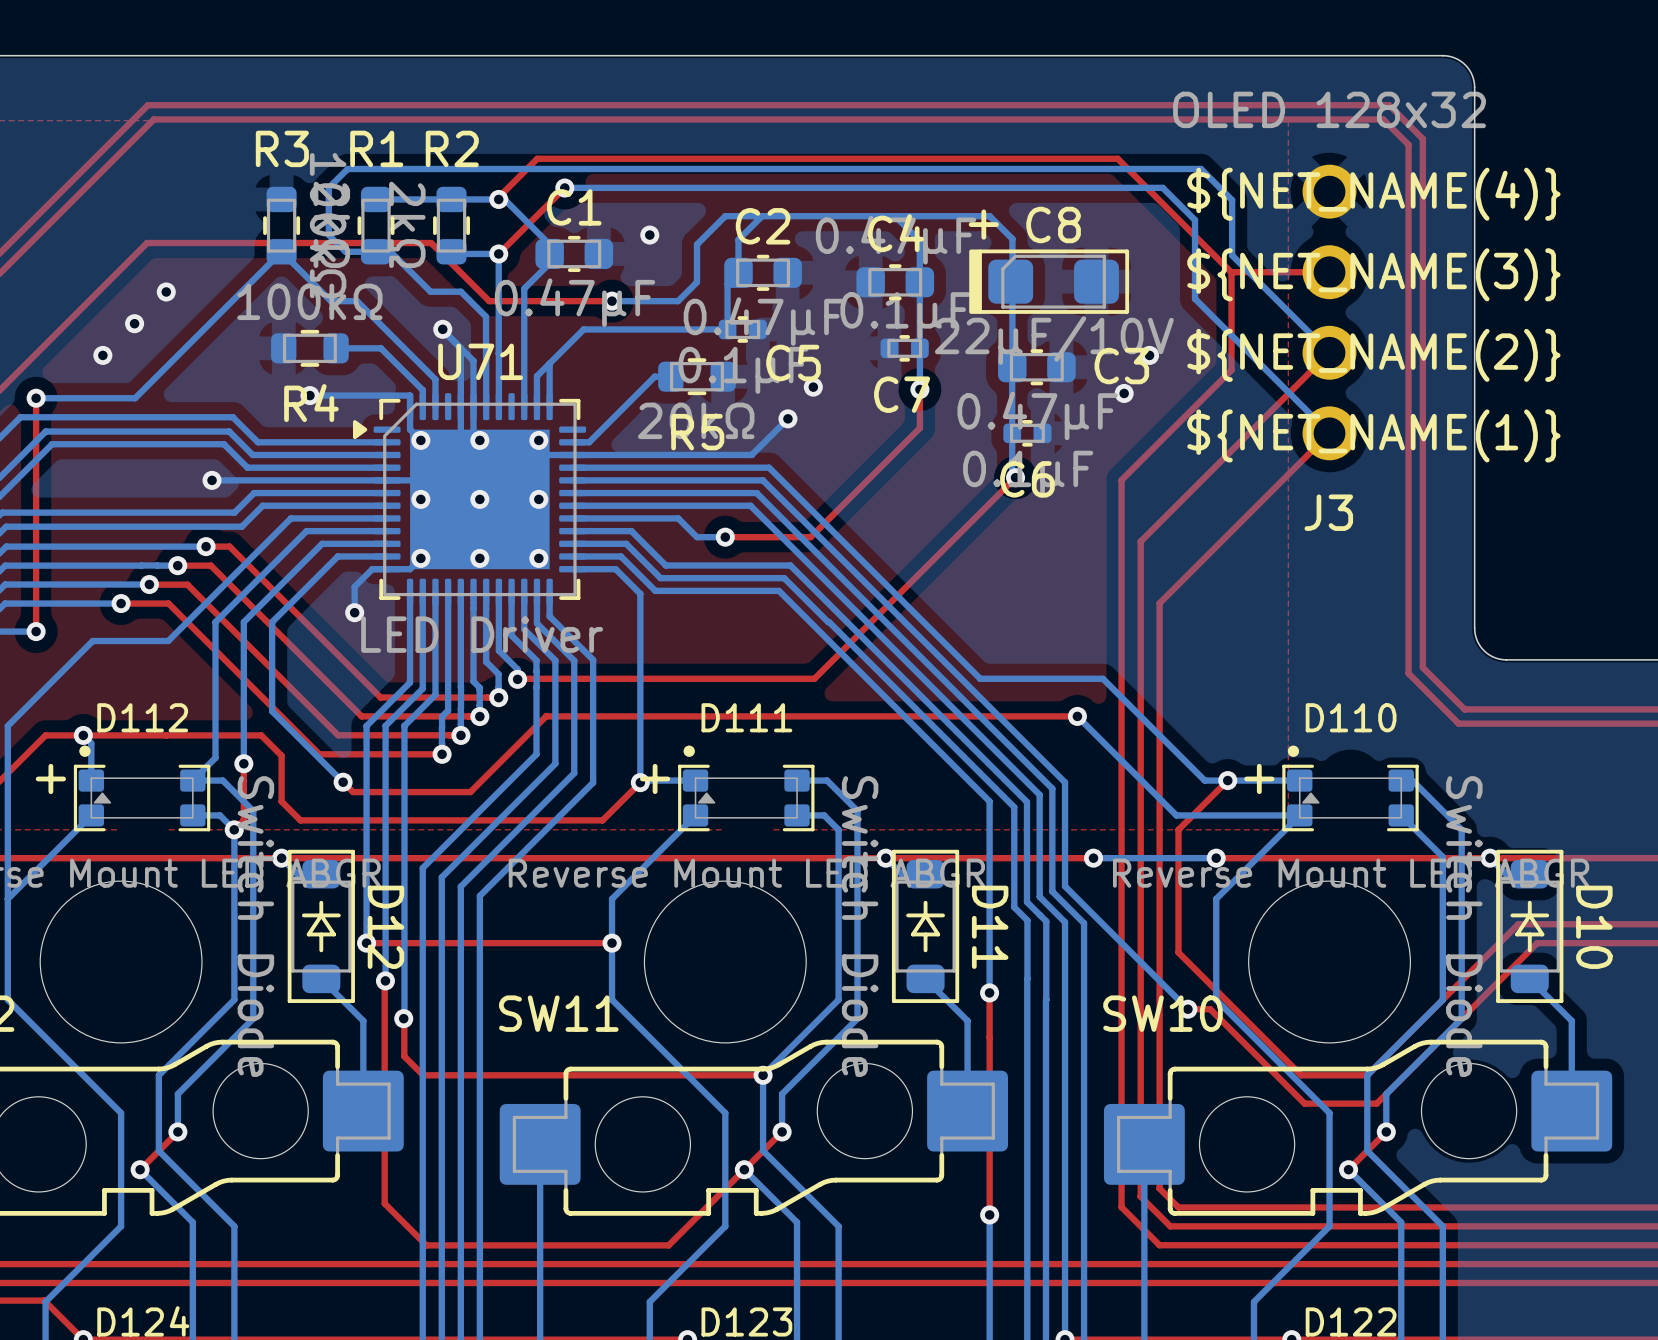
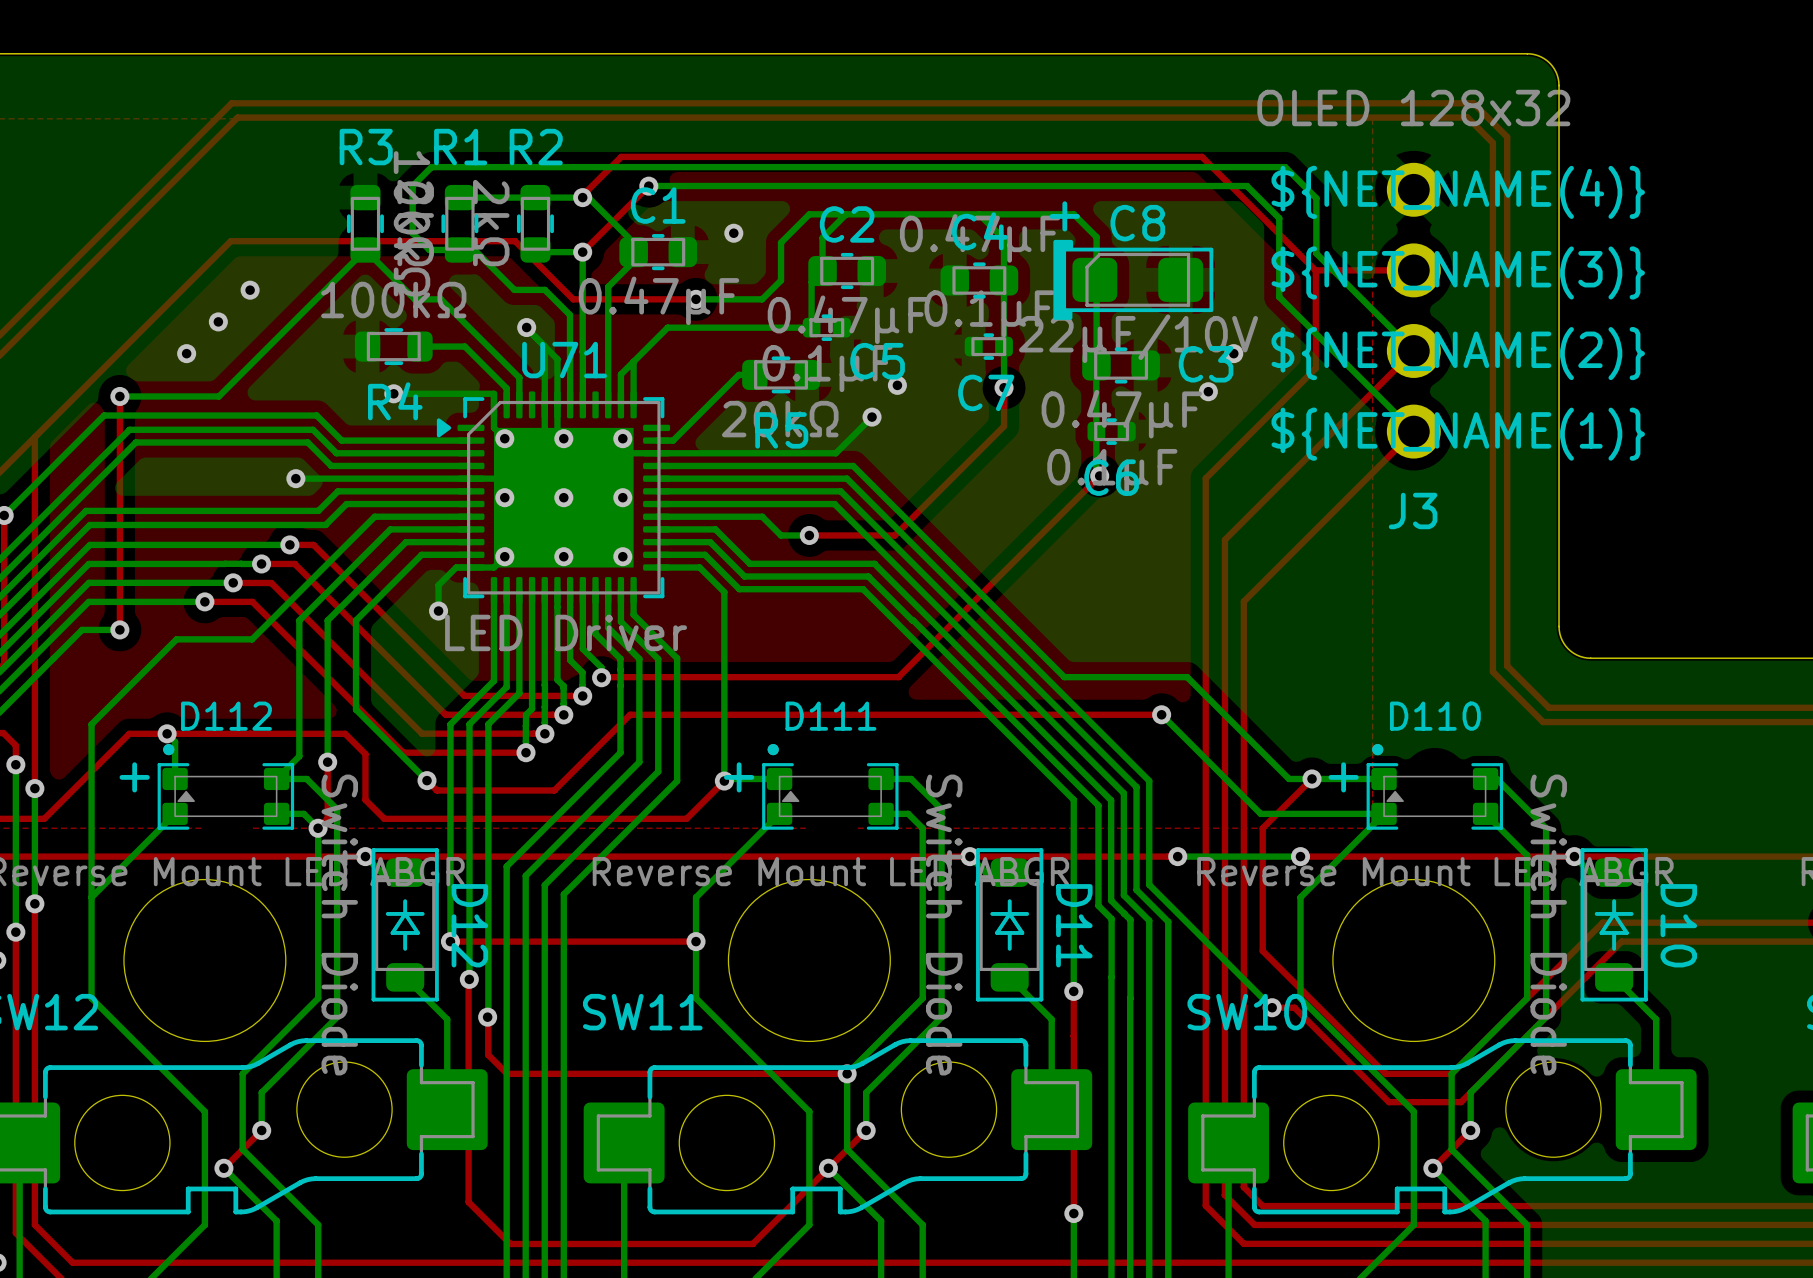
C8 footprint: [968, 209, 1130, 314] -> [1049, 201, 1214, 320]

